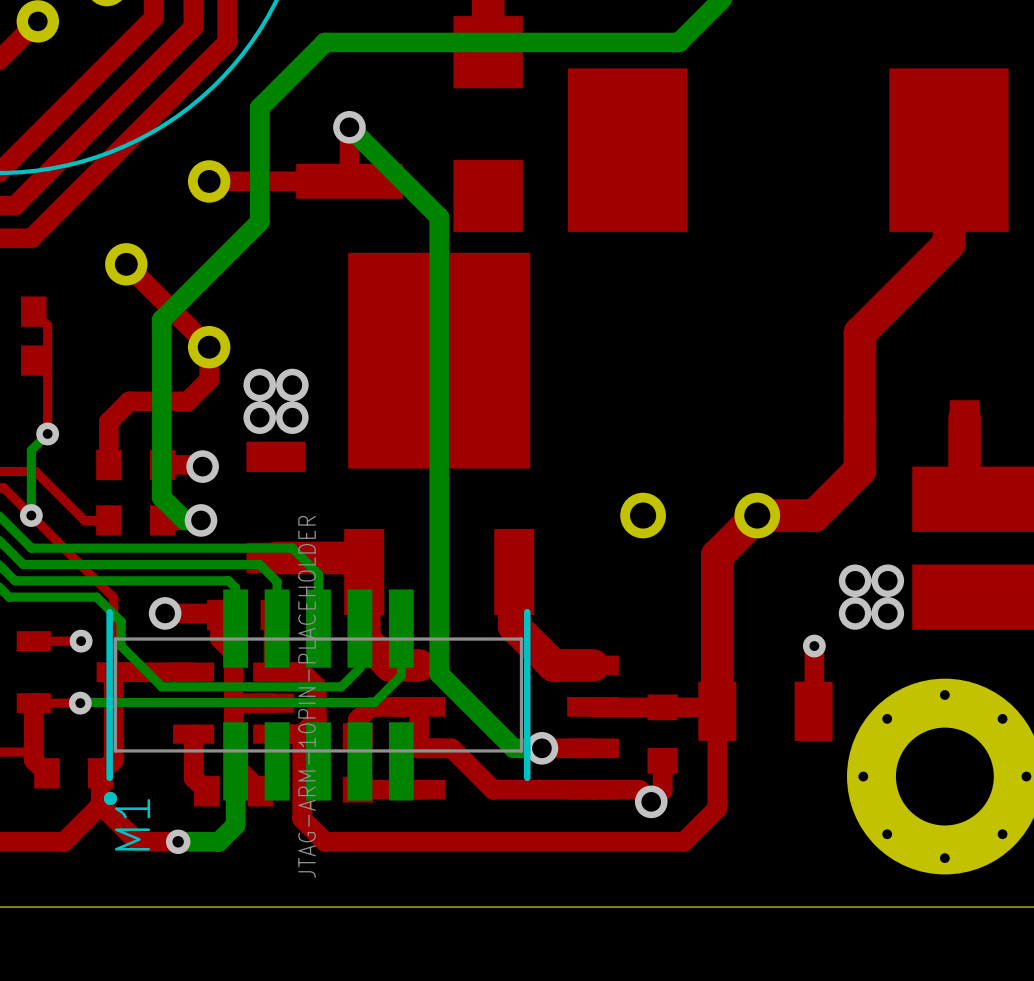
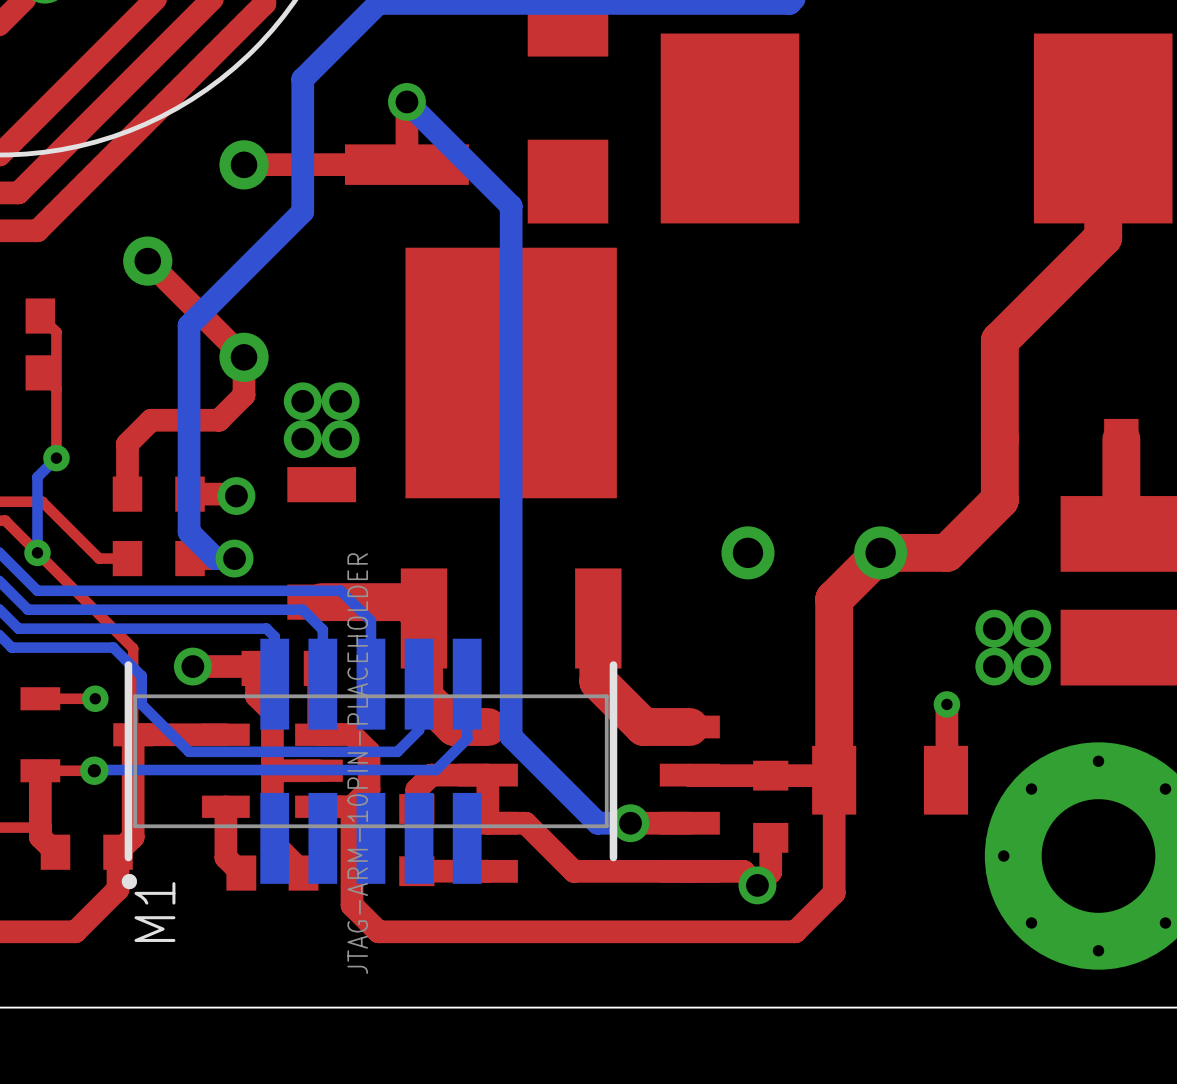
via: (80, 703) -> none
bottom track: (235, 761) (235, 825) (218, 841) (178, 841) -> none
top track: (100, 805) (137, 841) (178, 841) -> none
via position: (178, 841) -> (94, 770)

